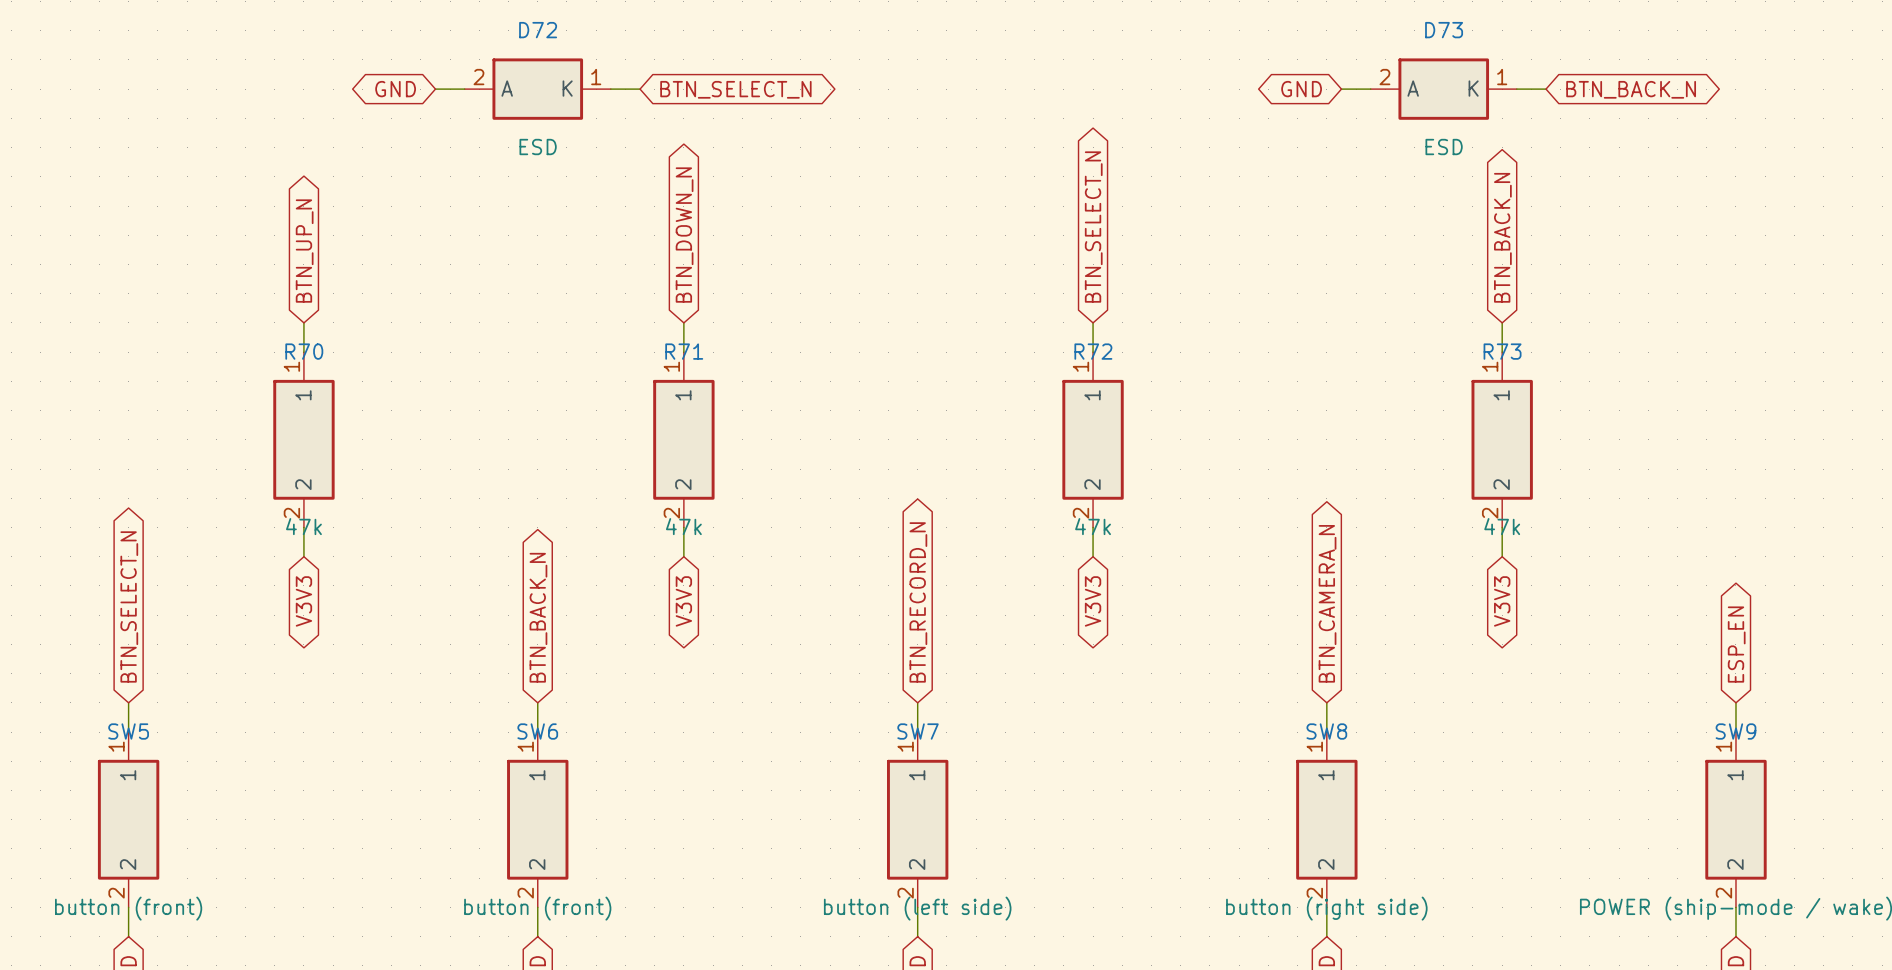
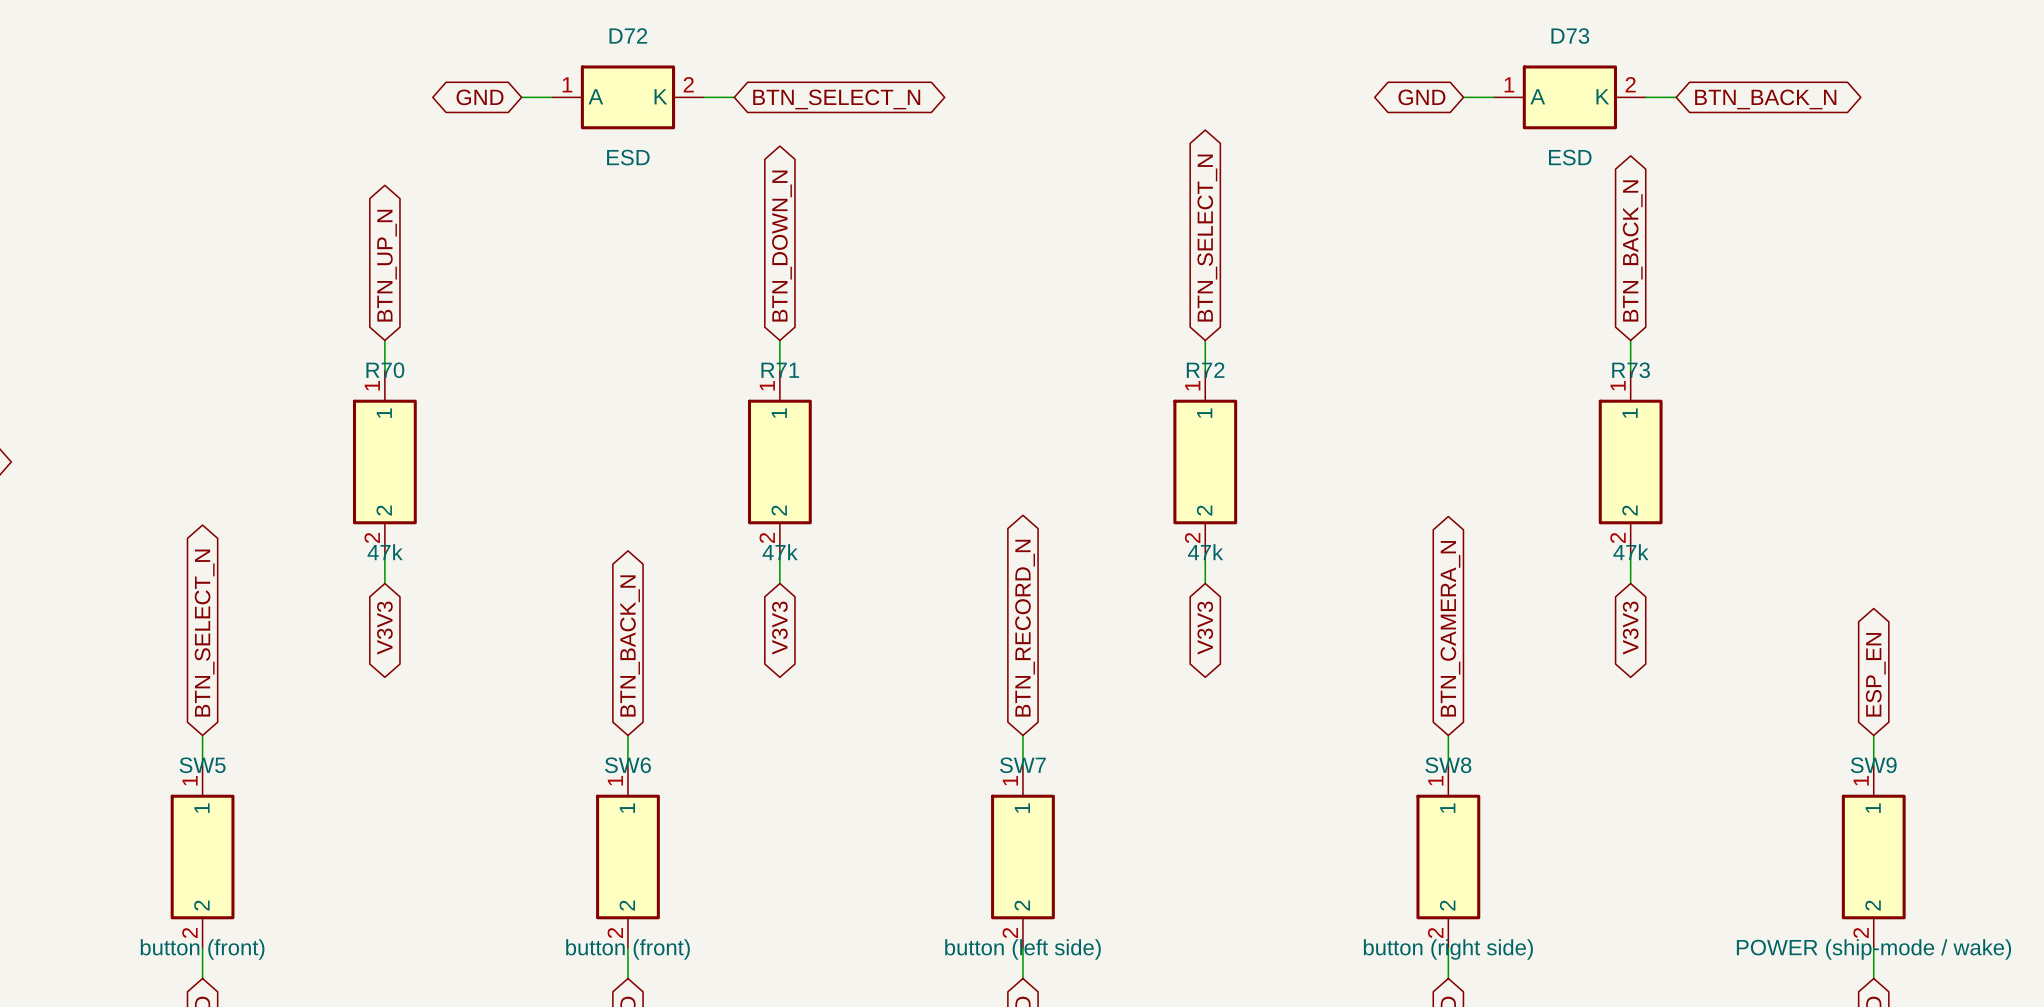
D72 pin number: 2 (478, 77) -> 1 (567, 84)
D72 pin number: 1 (596, 77) -> 2 (688, 84)
D73 pin number: 2 (1384, 77) -> 1 (1509, 84)
D73 pin number: 1 (1502, 77) -> 2 (1630, 84)

